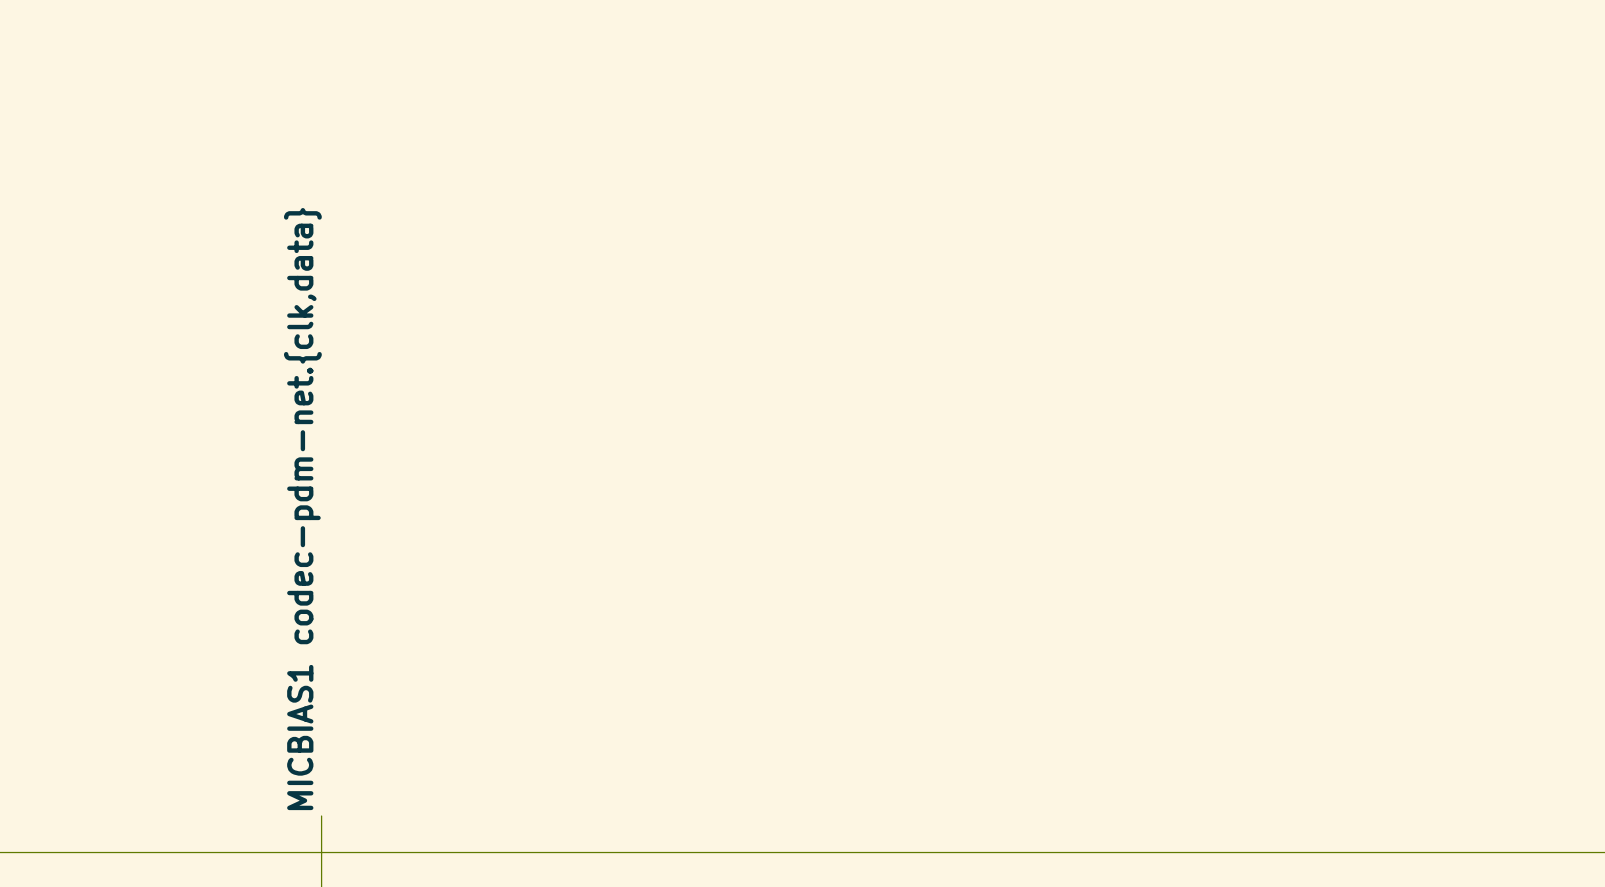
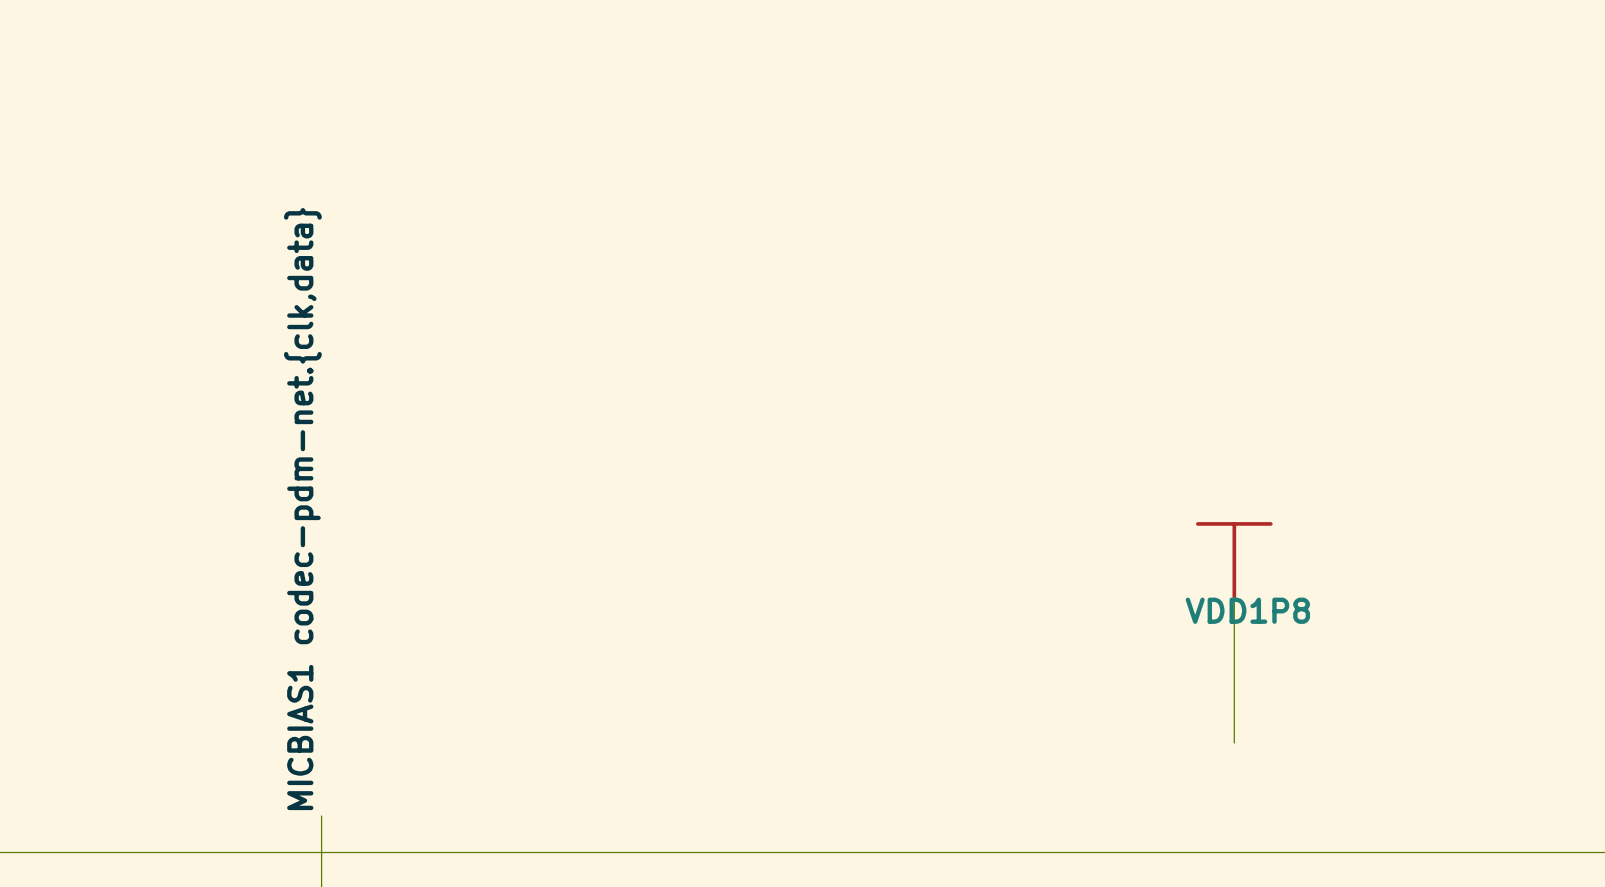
power symbol: none -> VDD1P8 (1234, 560)
wire: none -> (1234, 596) (1234, 742)

